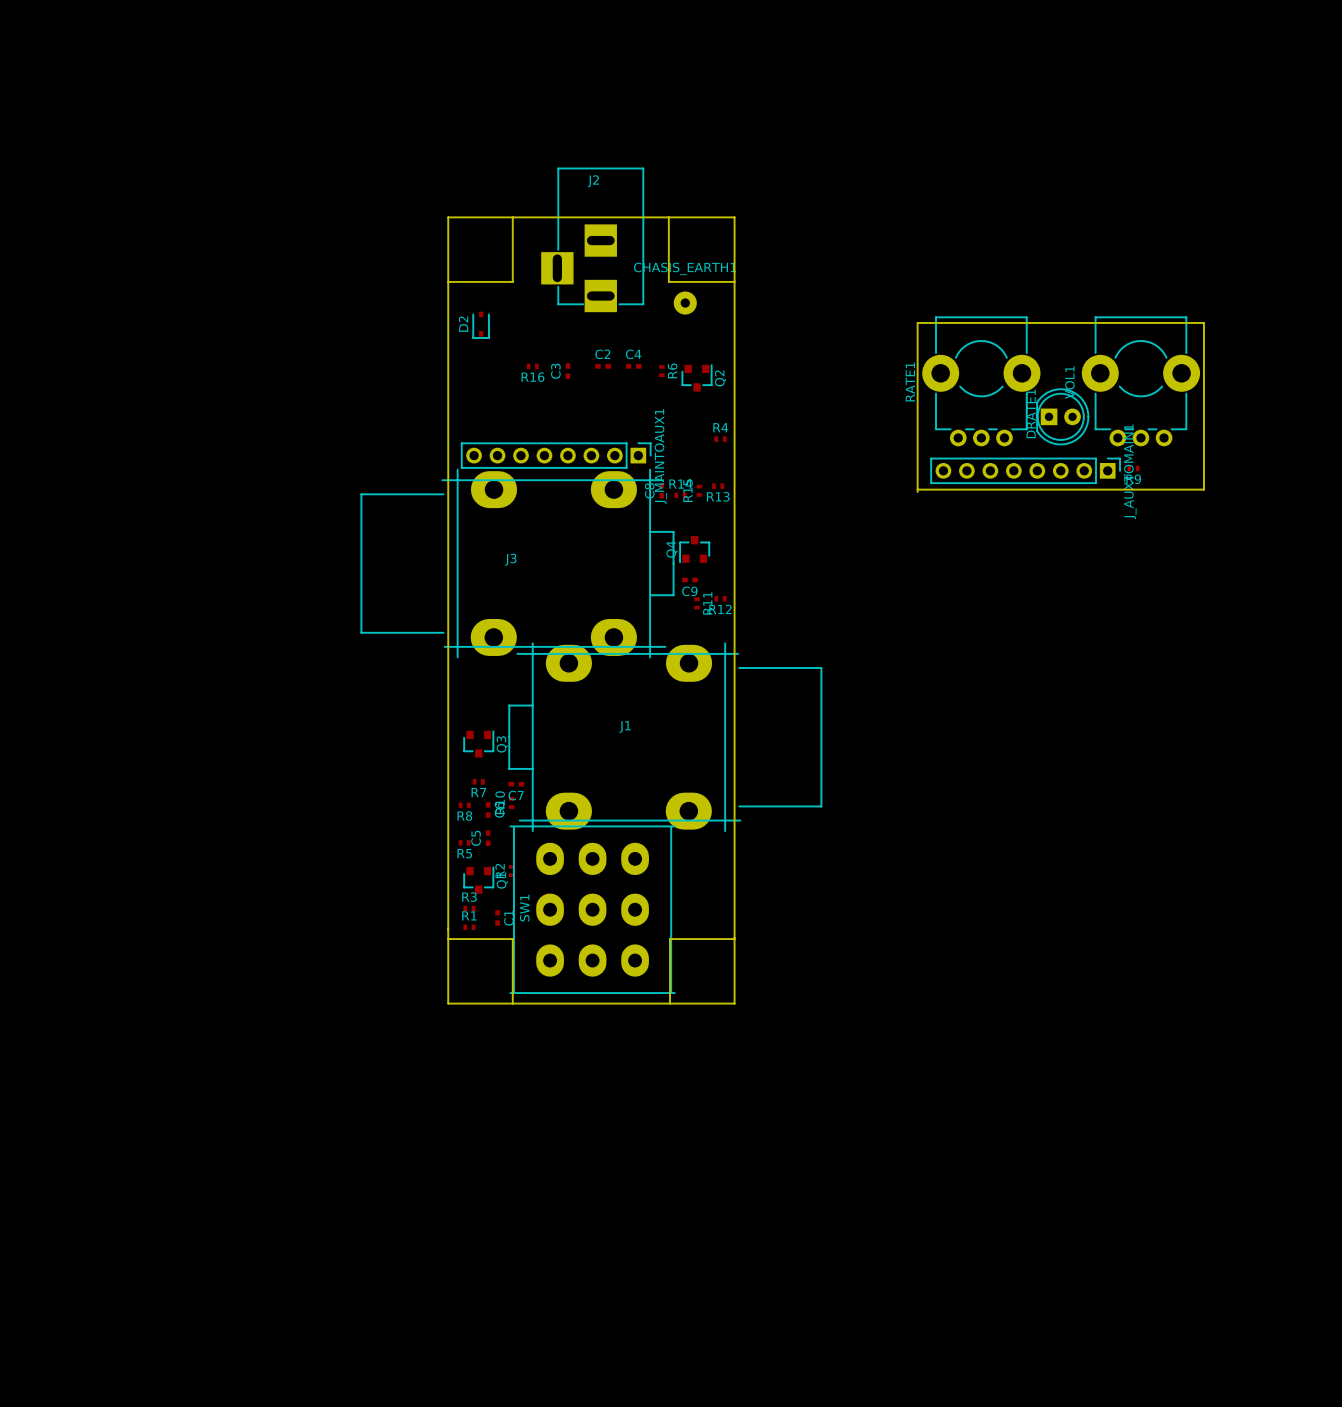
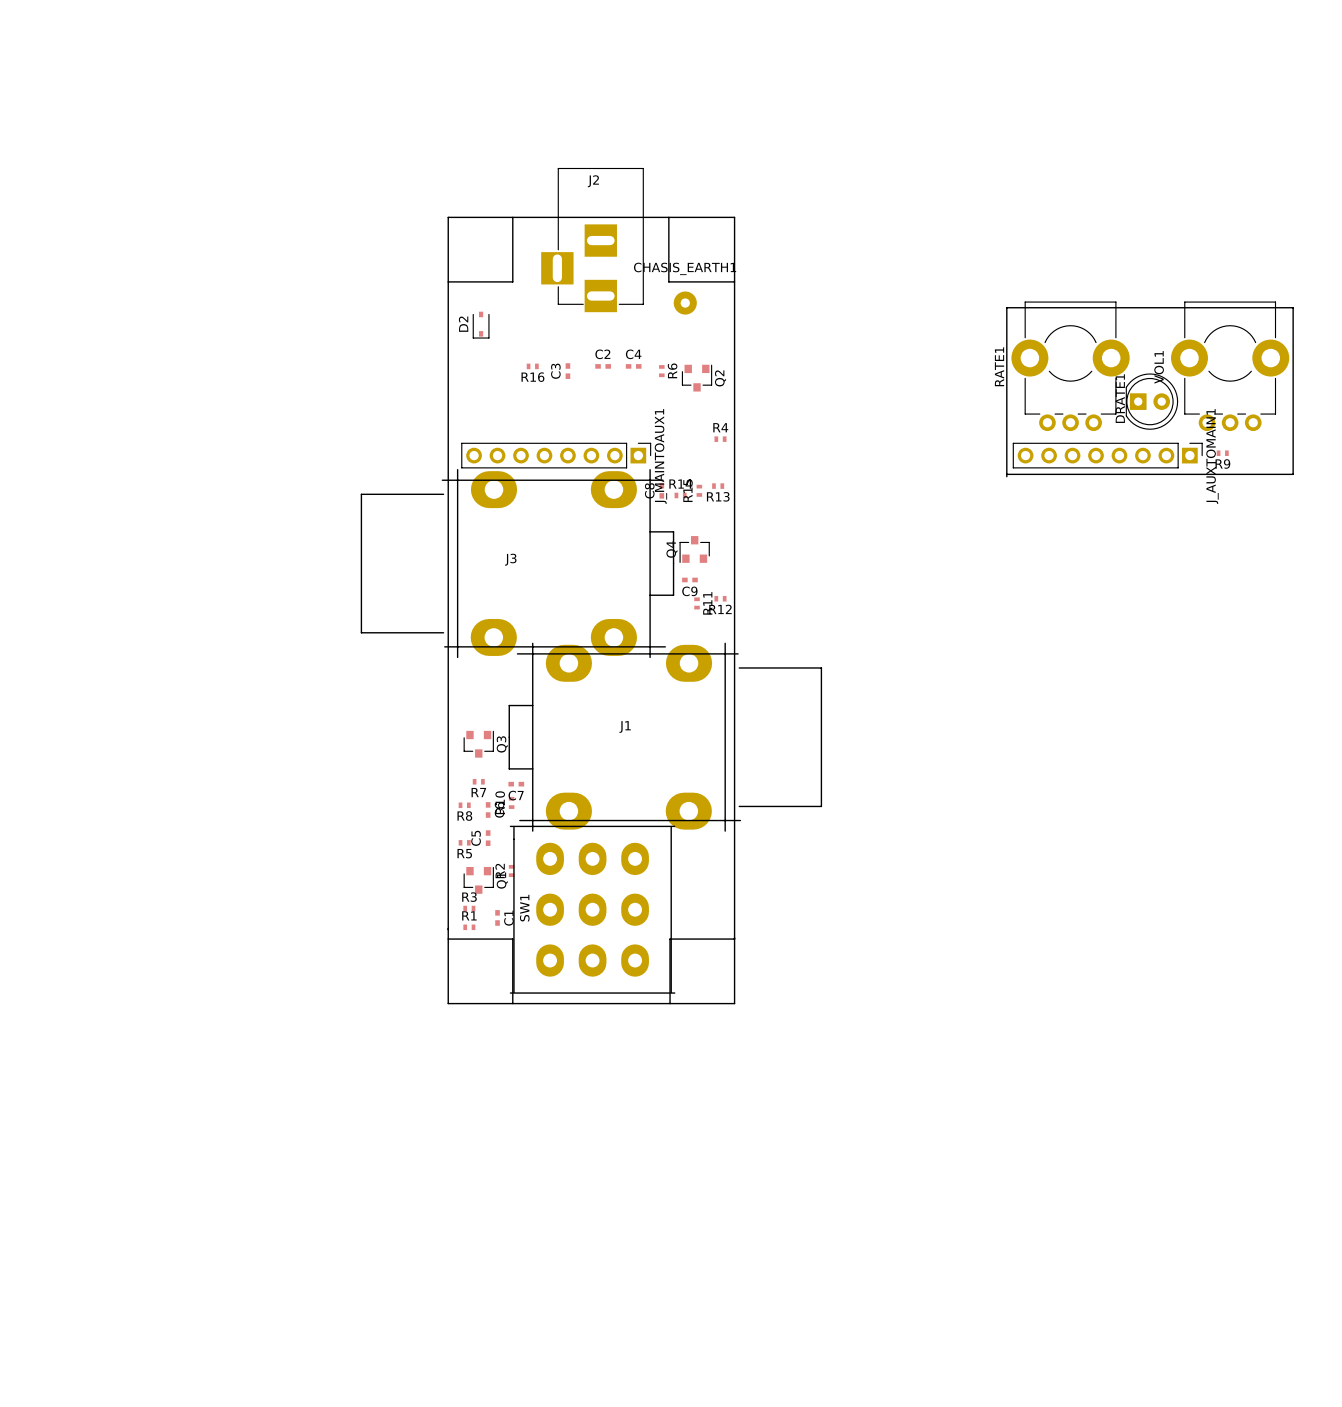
RATE1 position: (981, 381) -> (1070, 366)
VOL1 position: (1140, 381) -> (1230, 366)
DRATE1 footprint: [1036, 388, 1089, 446] -> [1125, 373, 1179, 430]
R9 position: (1133, 468) -> (1222, 453)
J_AUXTOMAIN1 position: (1025, 470) -> (1107, 455)
board edge: (917, 489) (1203, 489) (1203, 322) (917, 322) (917, 491) -> (1006, 474) (1293, 474) (1293, 307) (1006, 307) (1006, 476)

